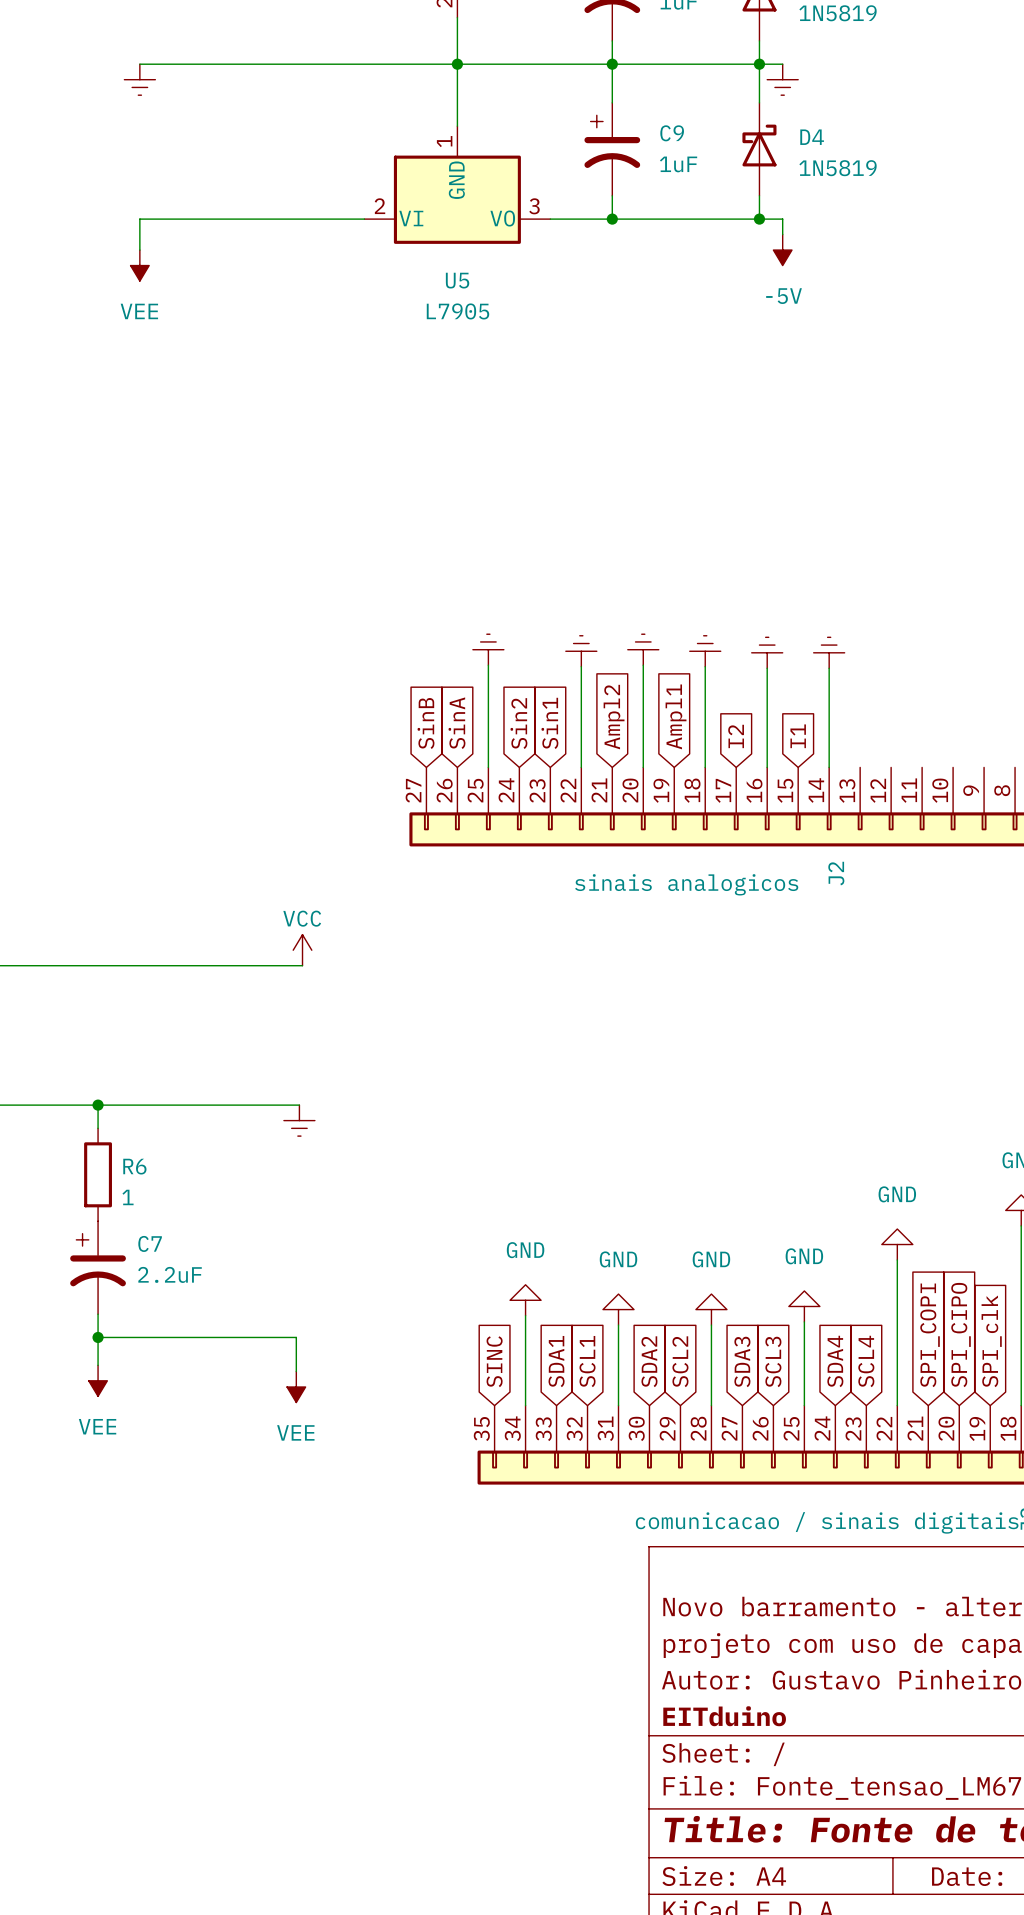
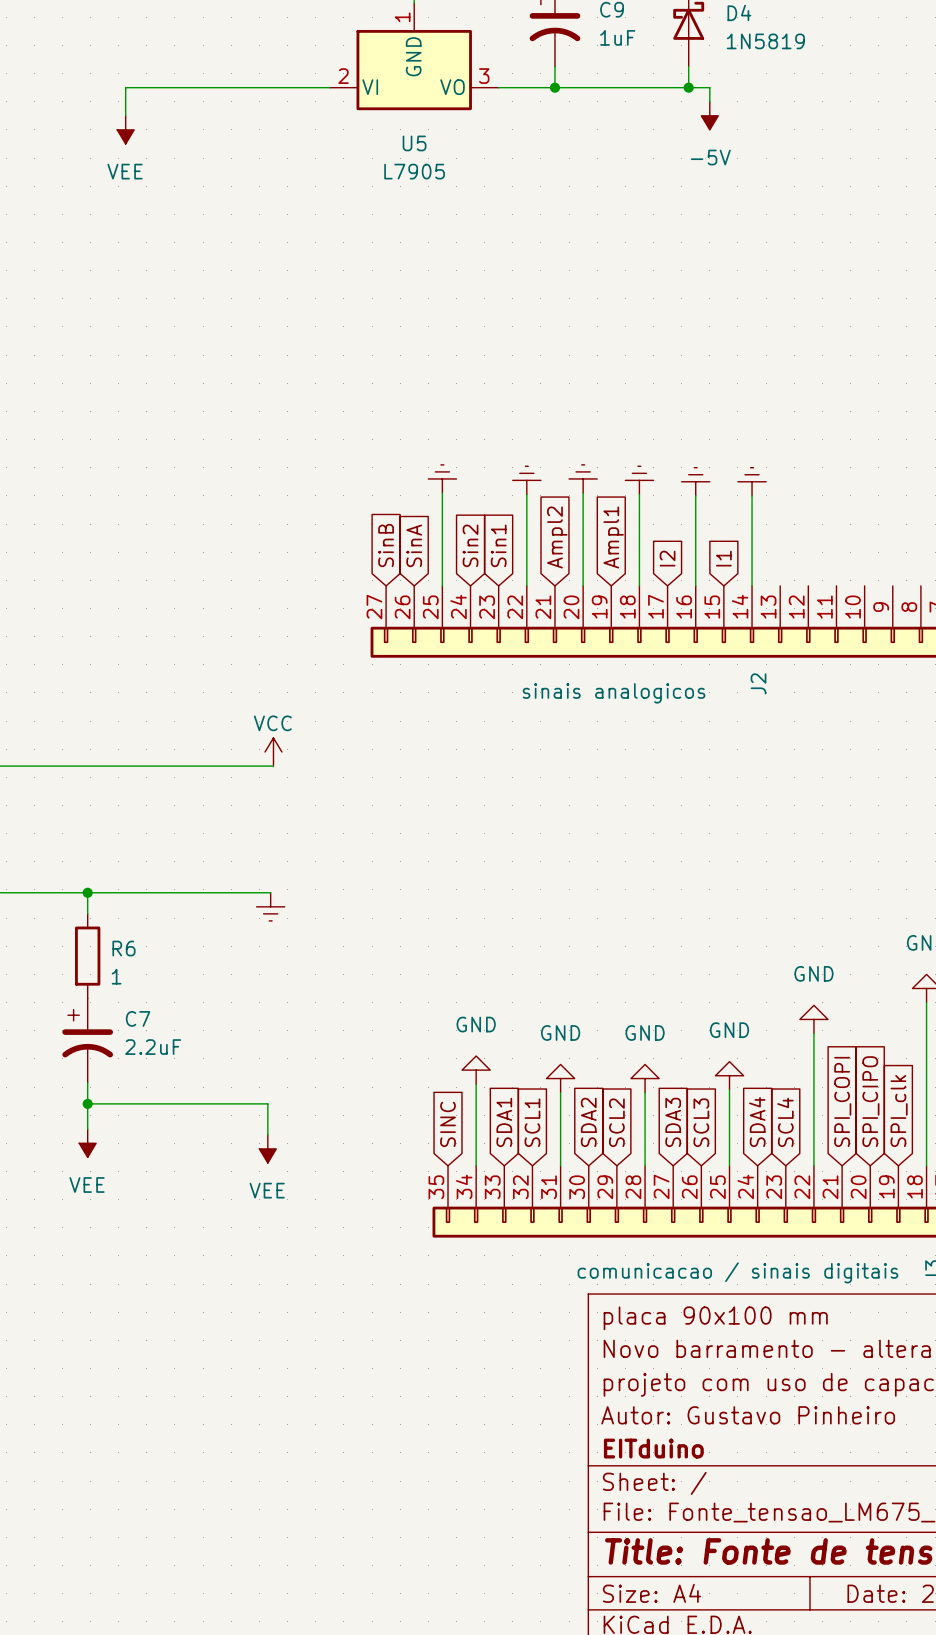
title block: none -> placa 90x100 mm (715, 1318)

